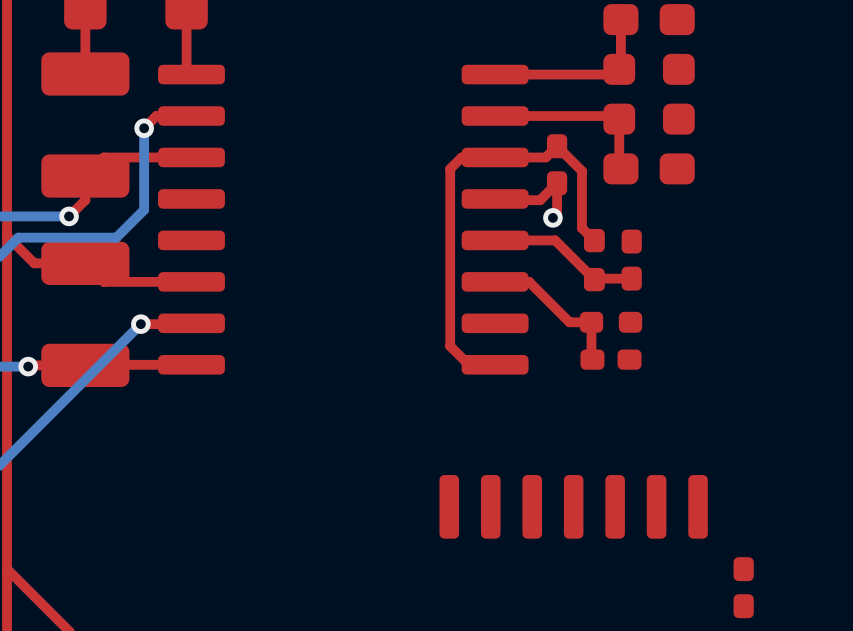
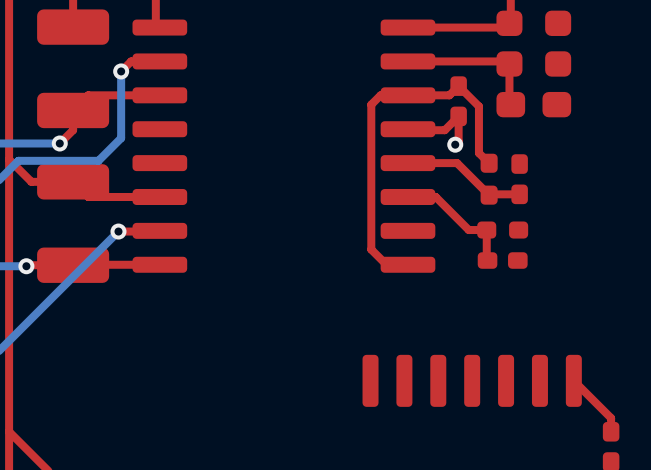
top track: none -> (573, 380) (611, 418) (611, 431)

